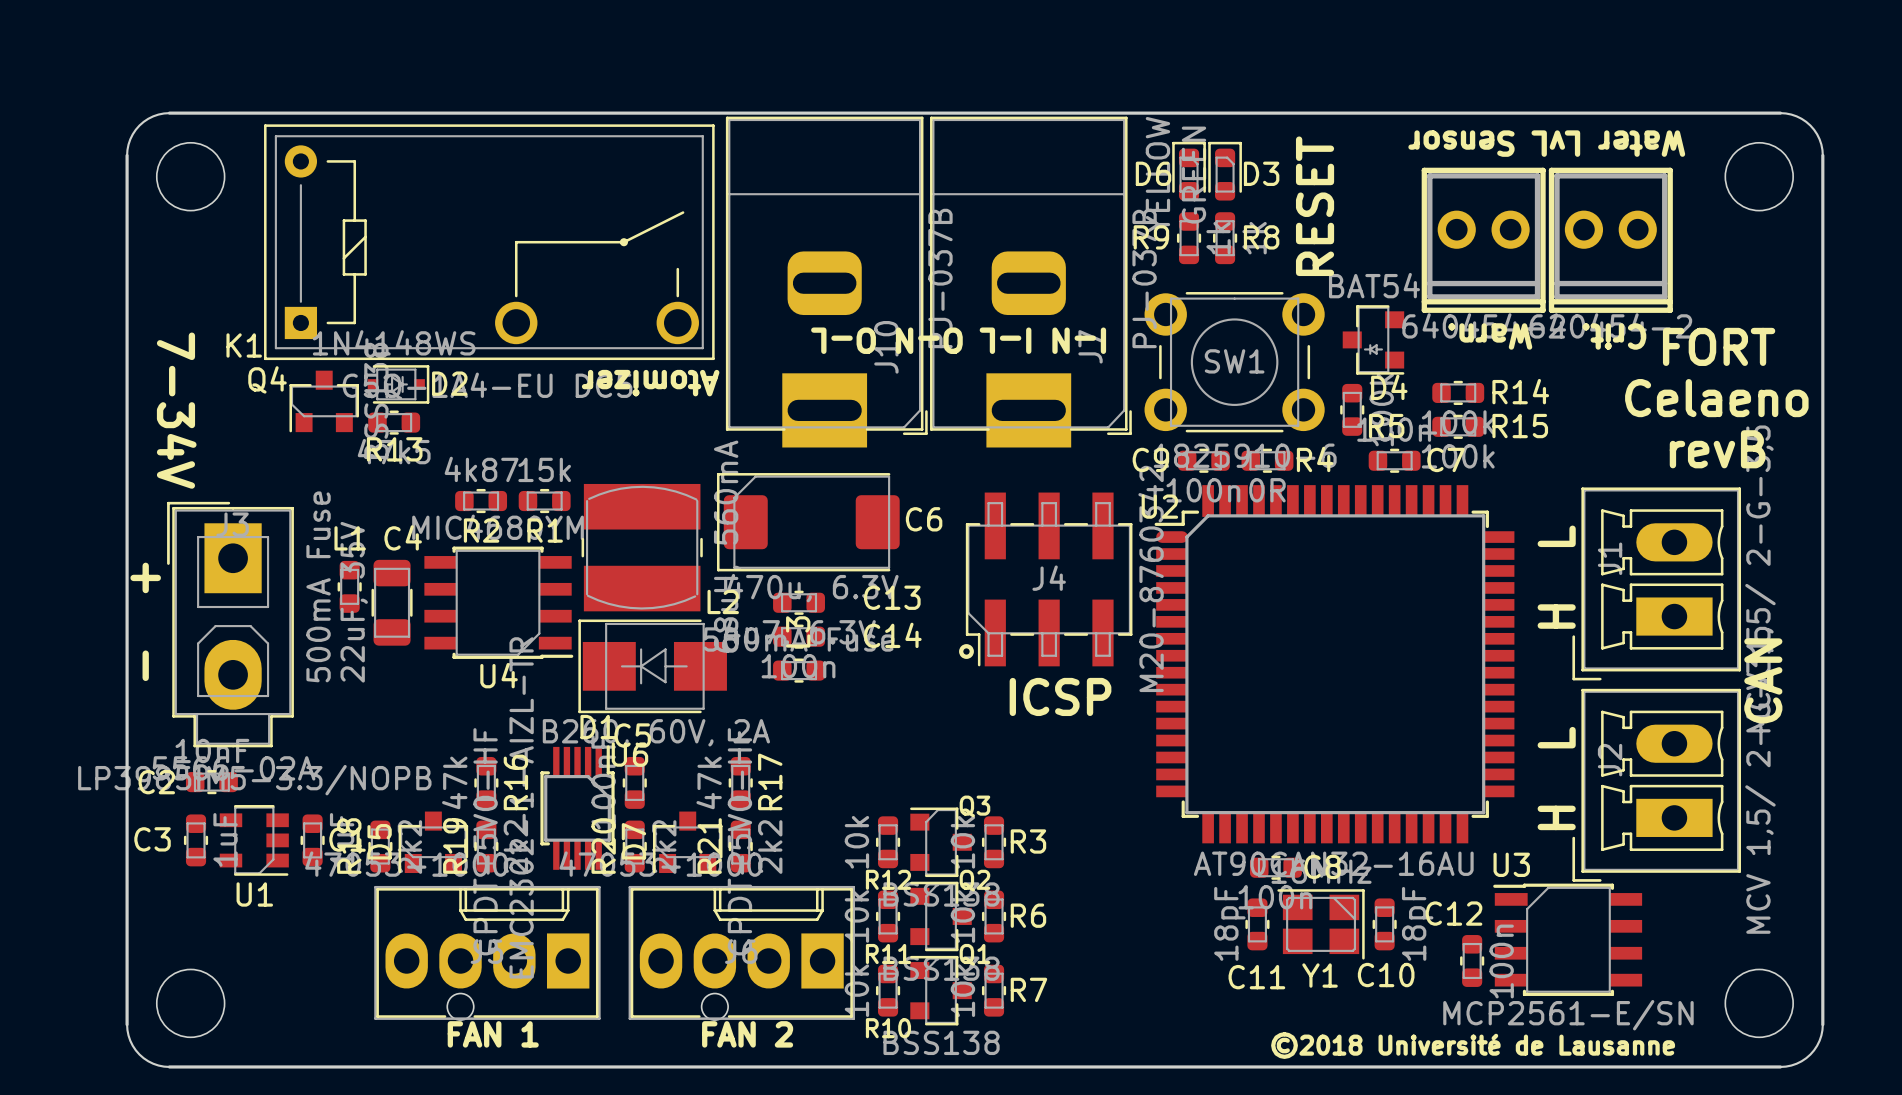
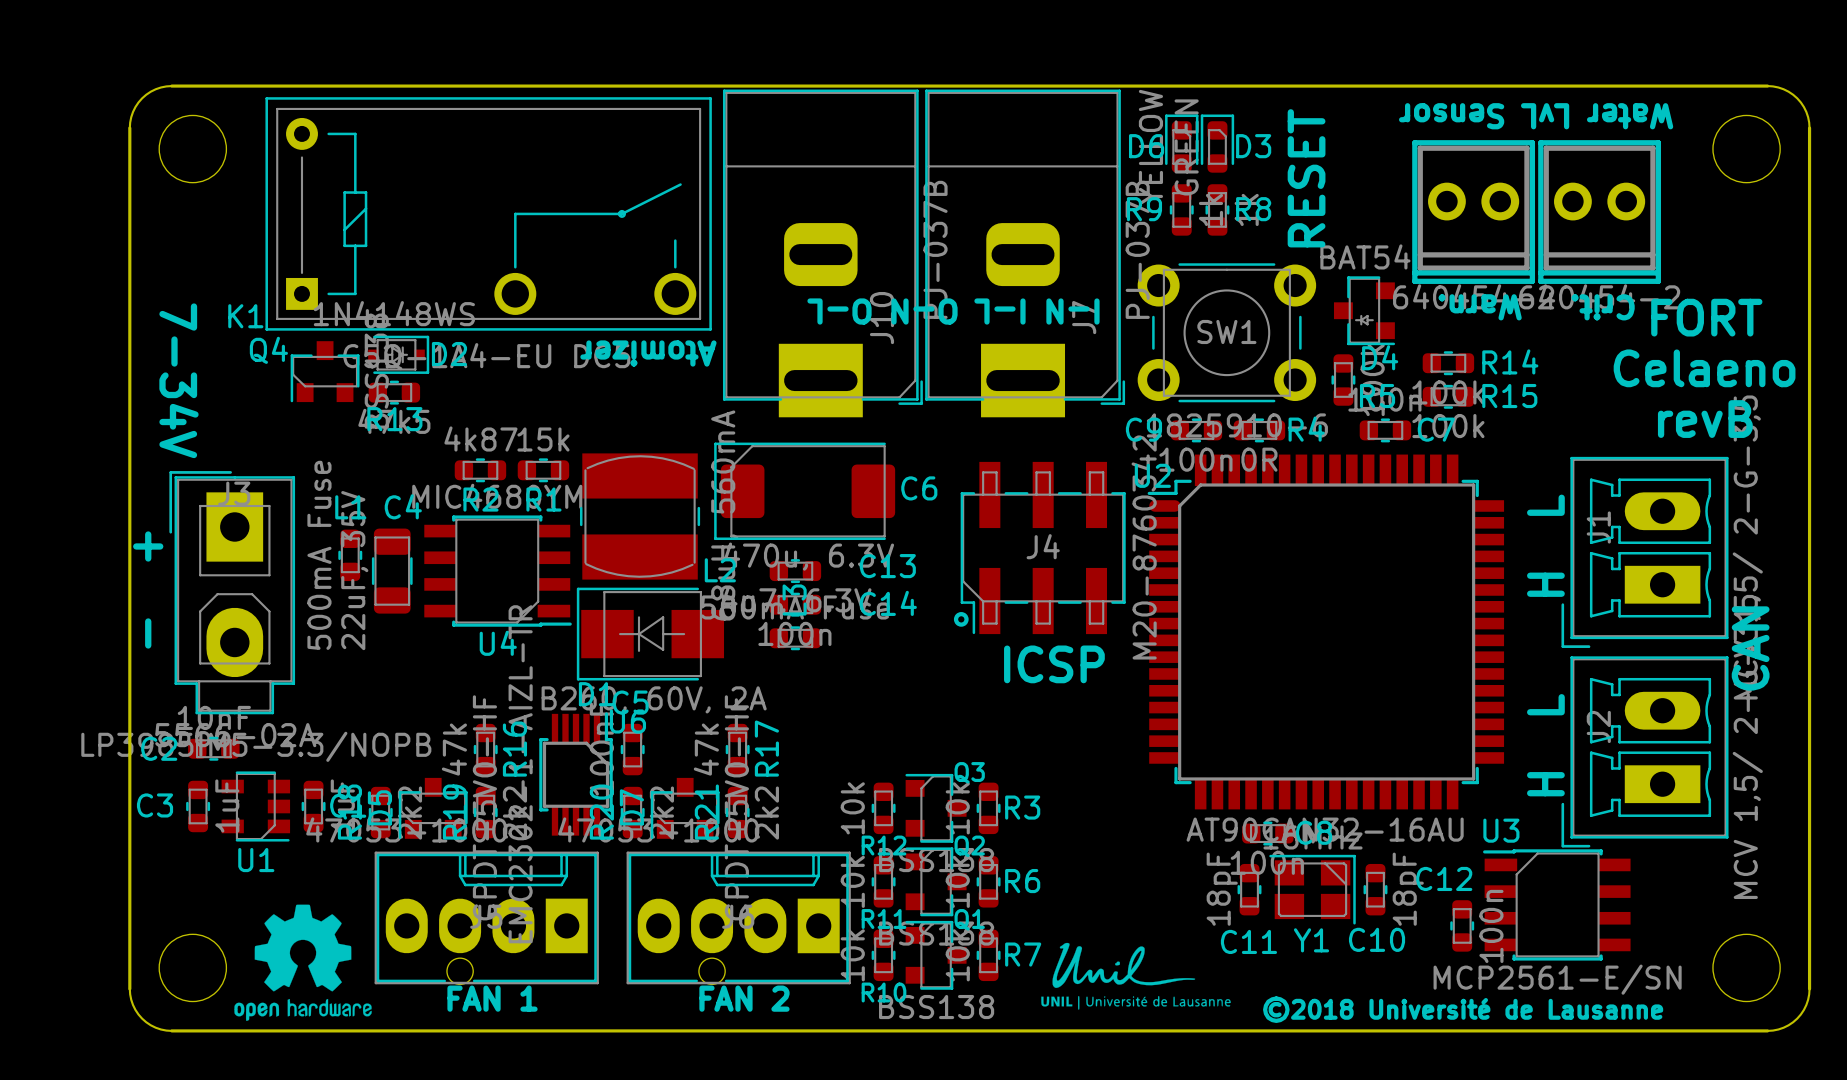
drawing: none -> [234, 904, 372, 1021]
drawing: none -> [1041, 942, 1231, 1010]

